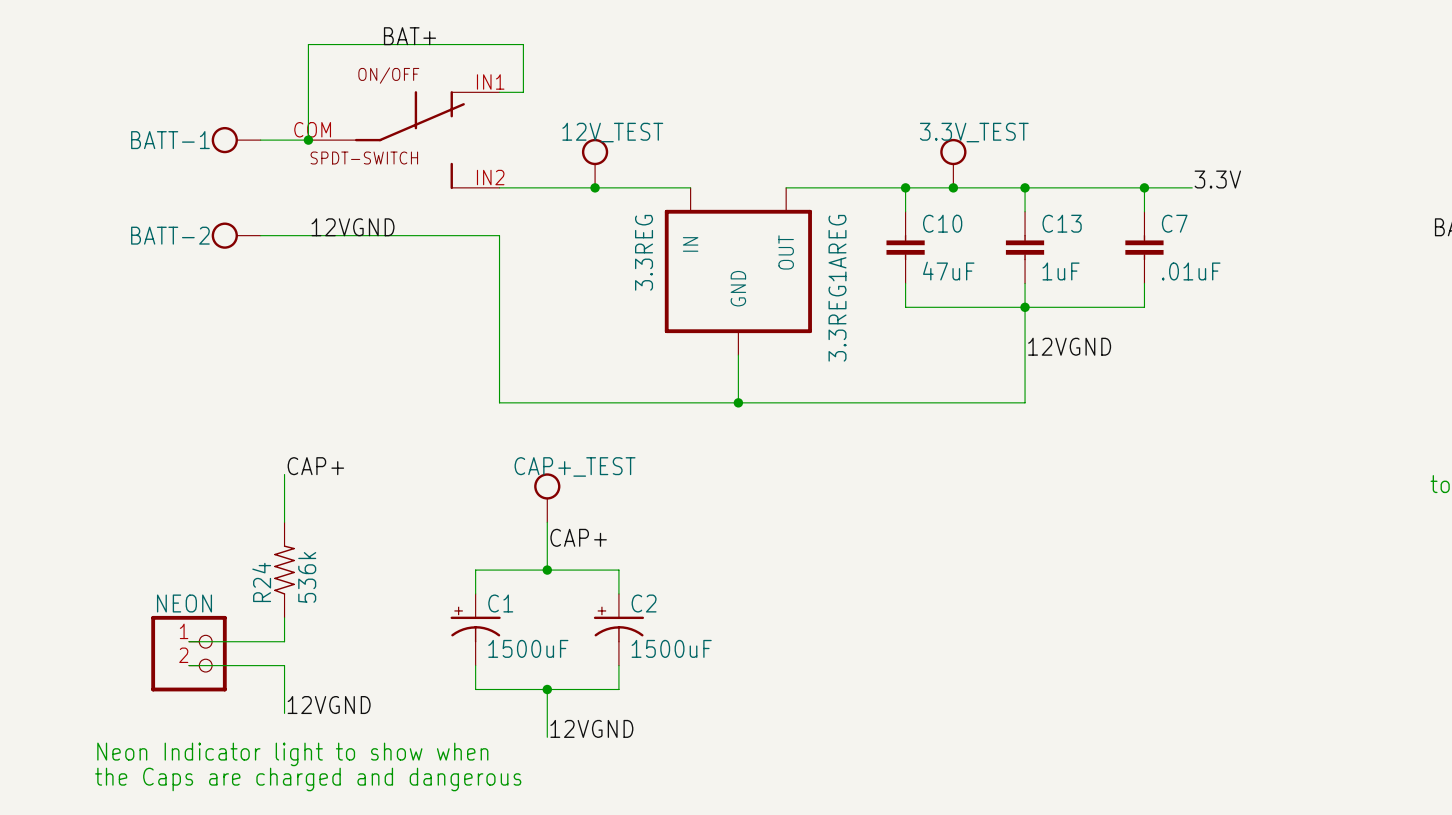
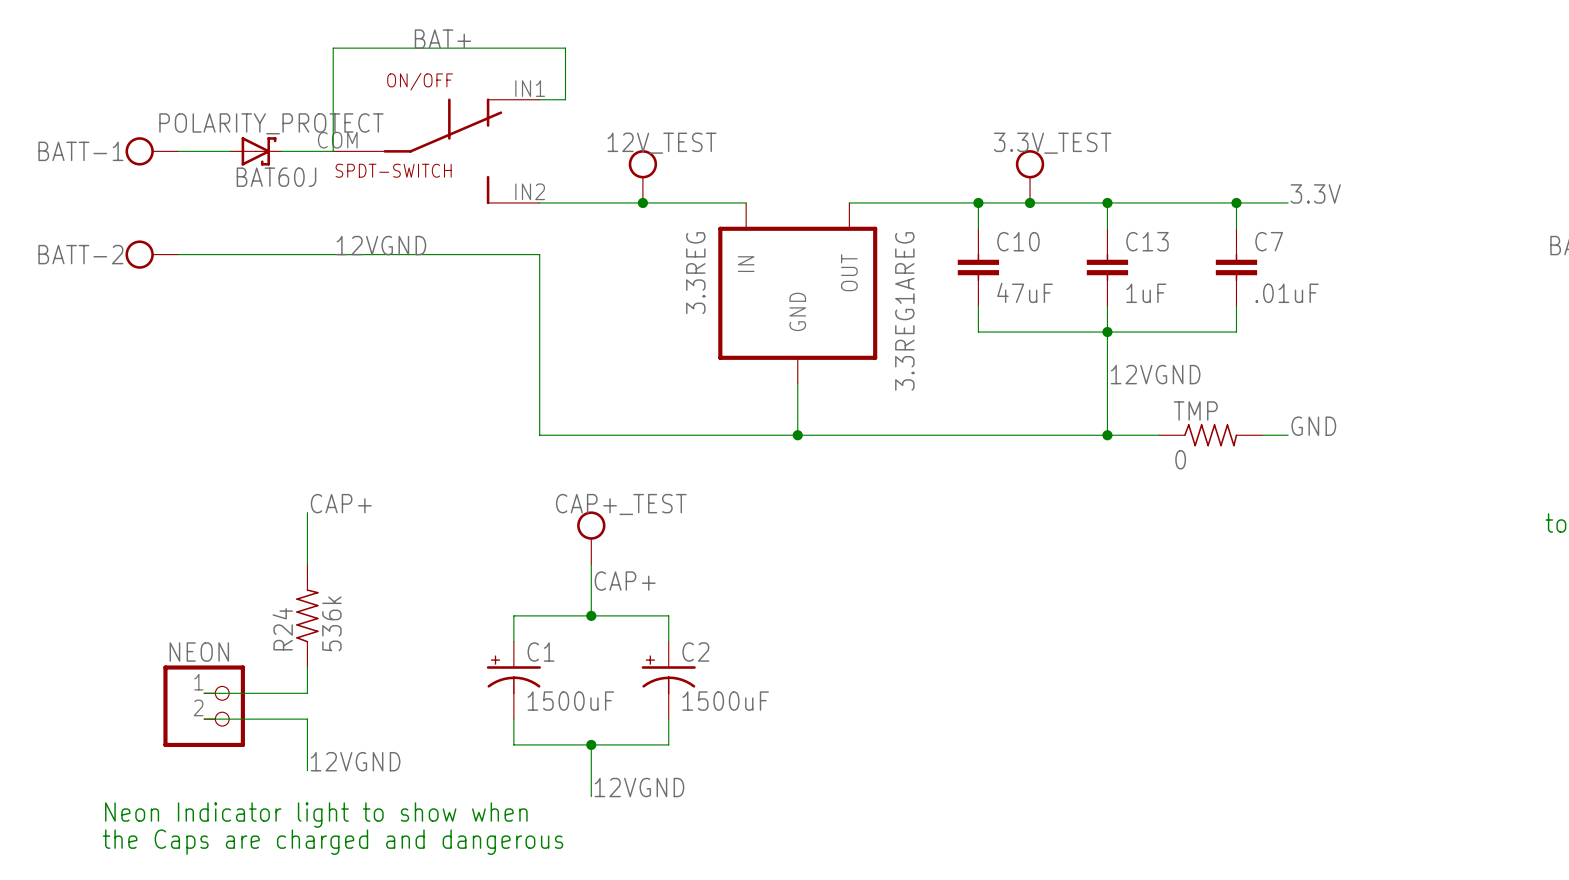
wire: none -> (178, 151) (229, 151)
BATT-1 position: (236, 140) -> (151, 151)
POLARITY_PROTECT: none -> BAT60J (255, 151)
junction: (308, 140) -> none
wire: none -> (178, 254) (281, 254)
BATT-2 position: (236, 235) -> (151, 254)
label: none -> GND (1313, 426)
wire: none -> (1107, 435) (1159, 435)
junction: none -> (1107, 435)
TMP: none -> 0 (1210, 435)
wire: none -> (1262, 435) (1288, 435)

